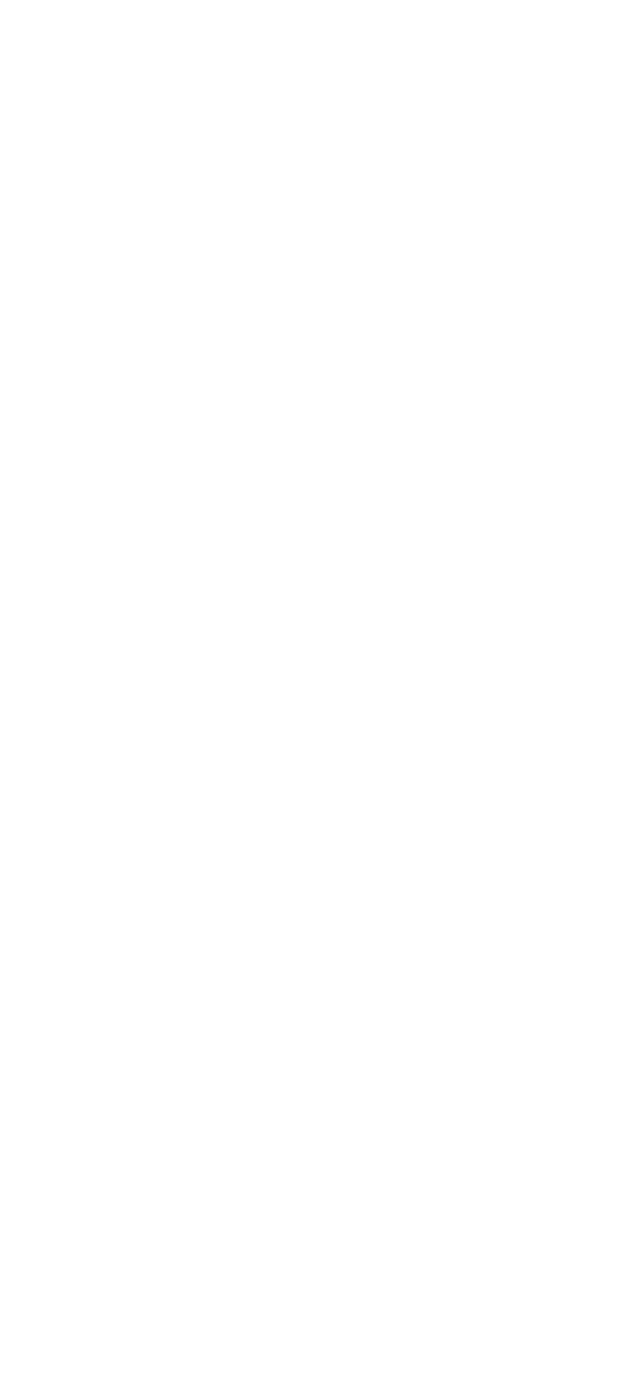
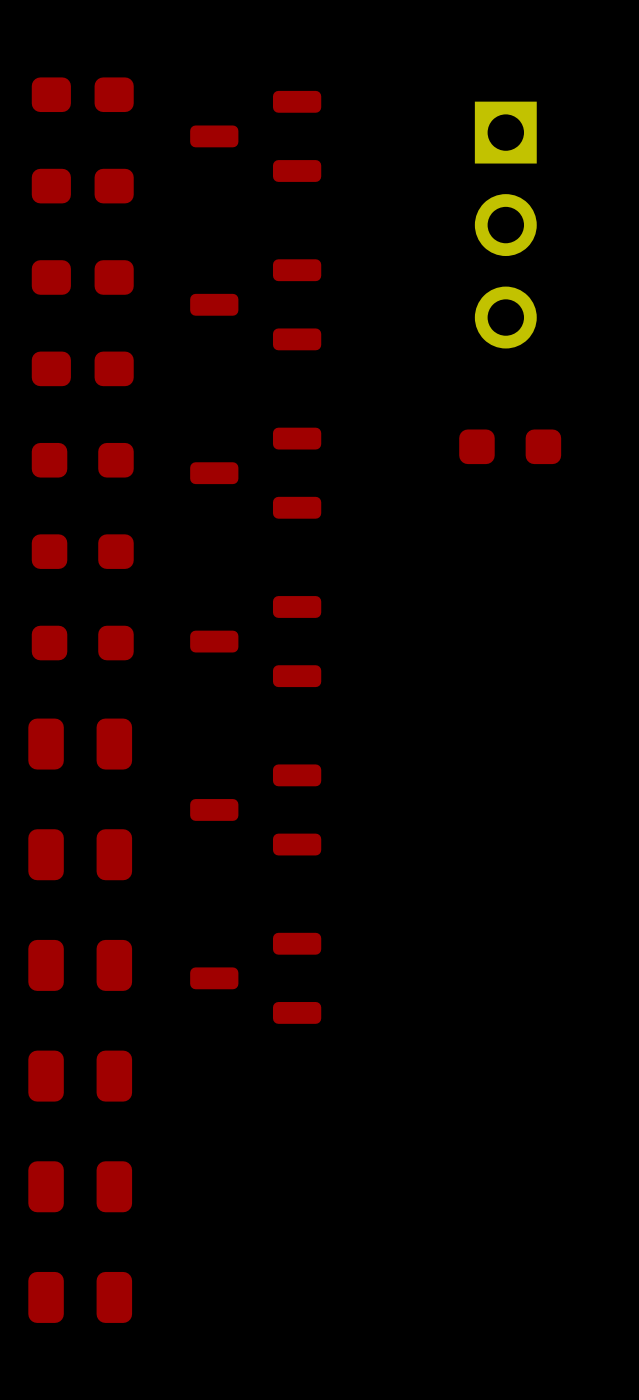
part: none -> (82, 94)
part: none -> (255, 136)
part: none -> (82, 186)
part: none -> (505, 225)
part: none -> (82, 277)
part: none -> (255, 304)
part: none -> (82, 368)
part: none -> (510, 446)
part: none -> (82, 460)
part: none -> (255, 473)
part: none -> (82, 551)
part: none -> (255, 641)
part: none -> (82, 643)
part: none -> (80, 744)
part: none -> (255, 809)
part: none -> (80, 854)
part: none -> (80, 965)
part: none -> (255, 978)
part: none -> (80, 1076)
part: none -> (80, 1186)
part: none -> (80, 1297)

